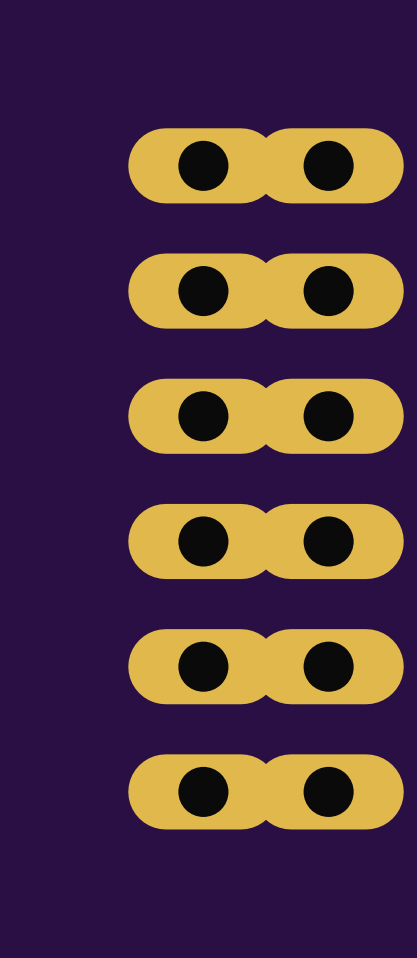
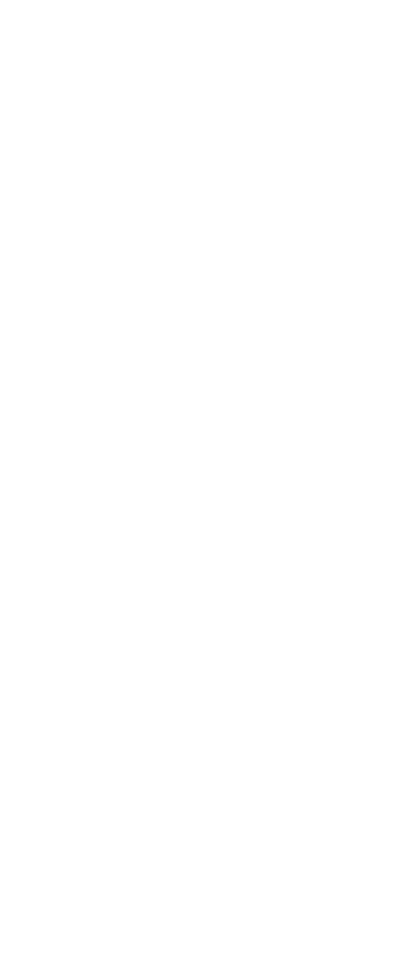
part: (203, 478) -> none
part: (328, 478) -> none

